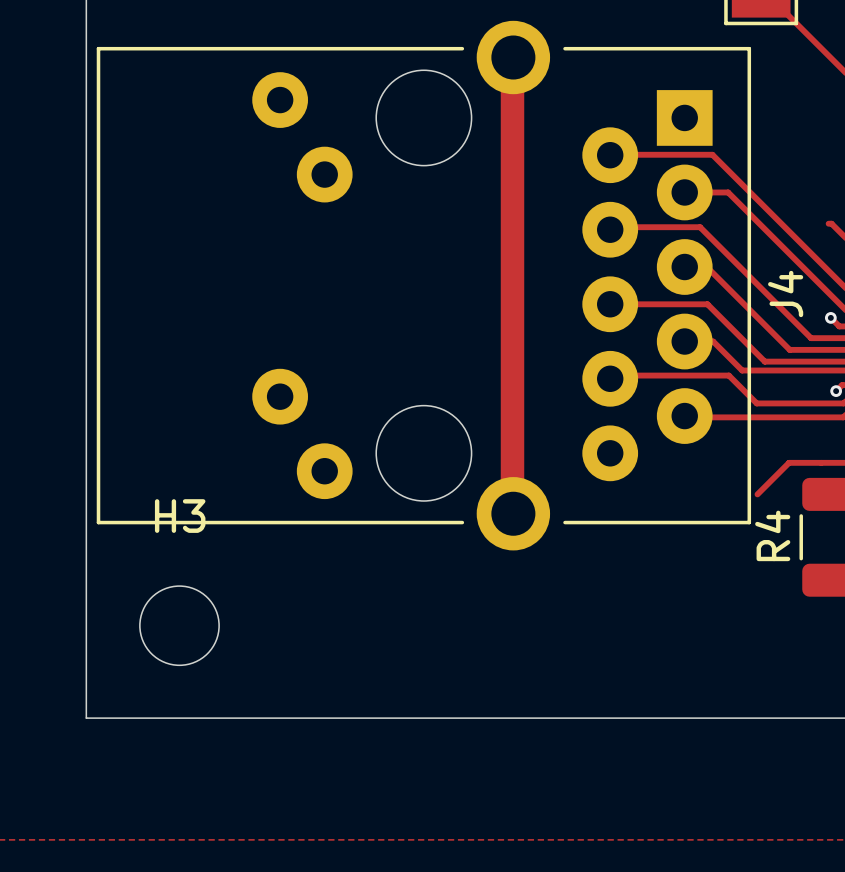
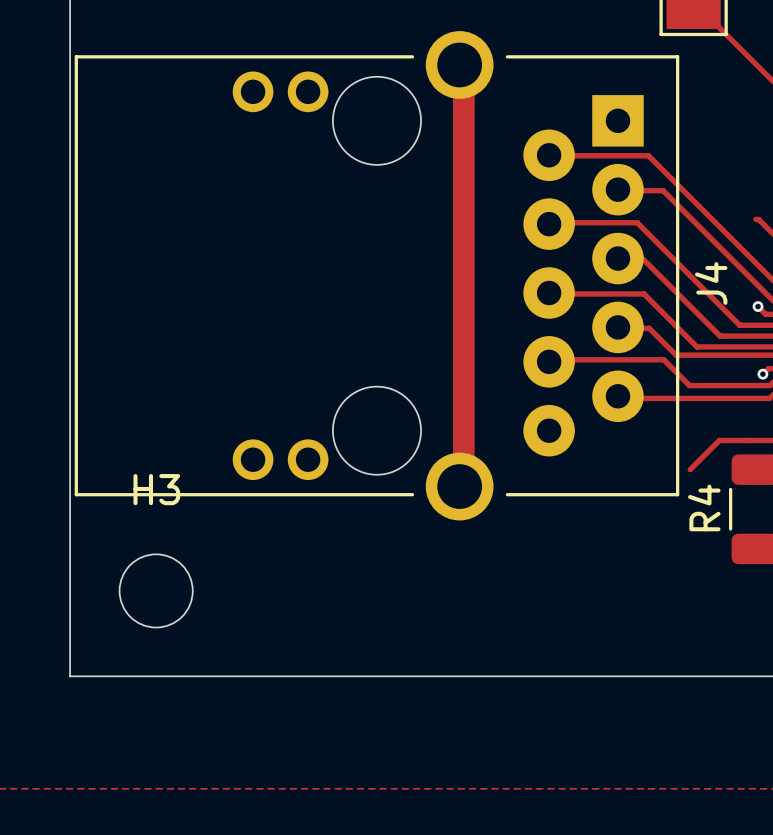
J4 footprint: [96, 20, 752, 551] -> [74, 31, 680, 521]

